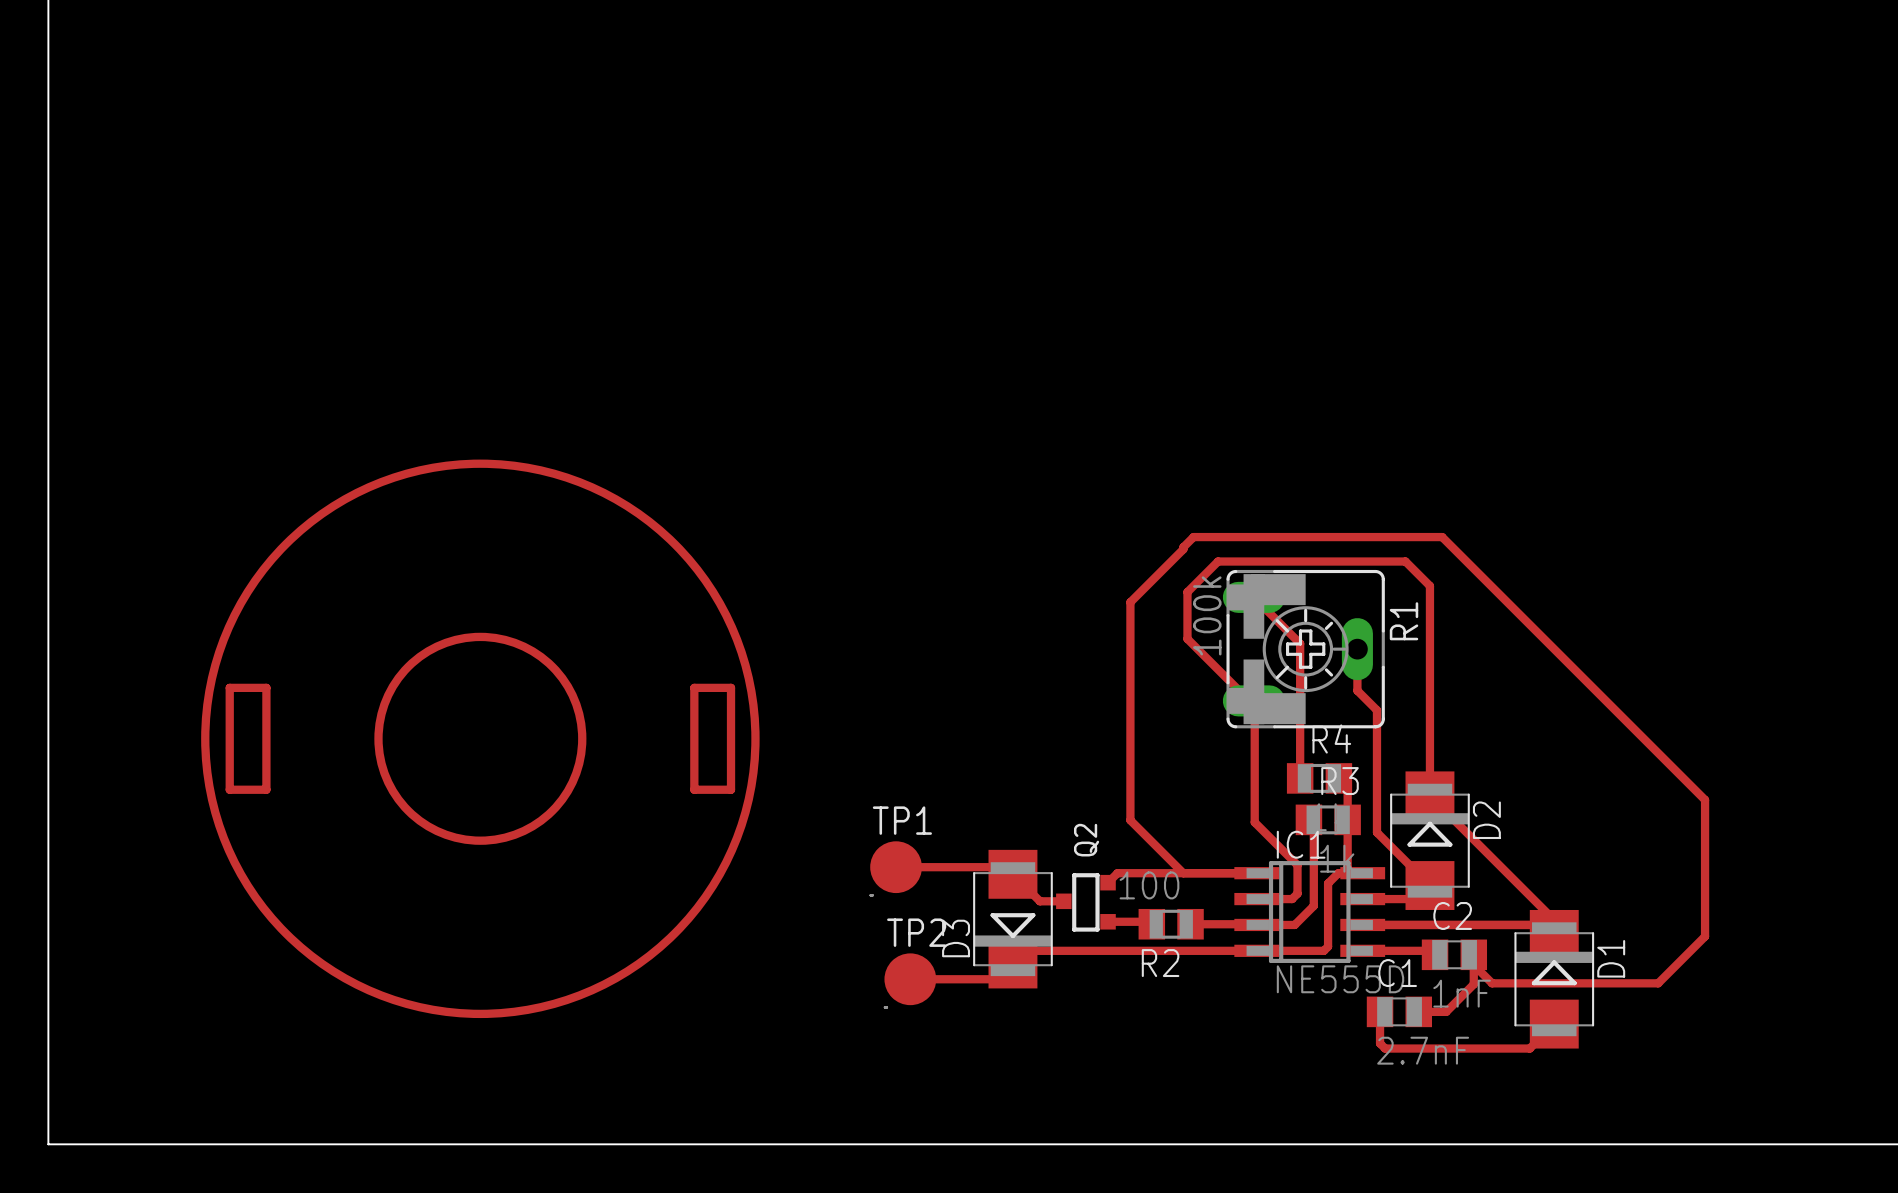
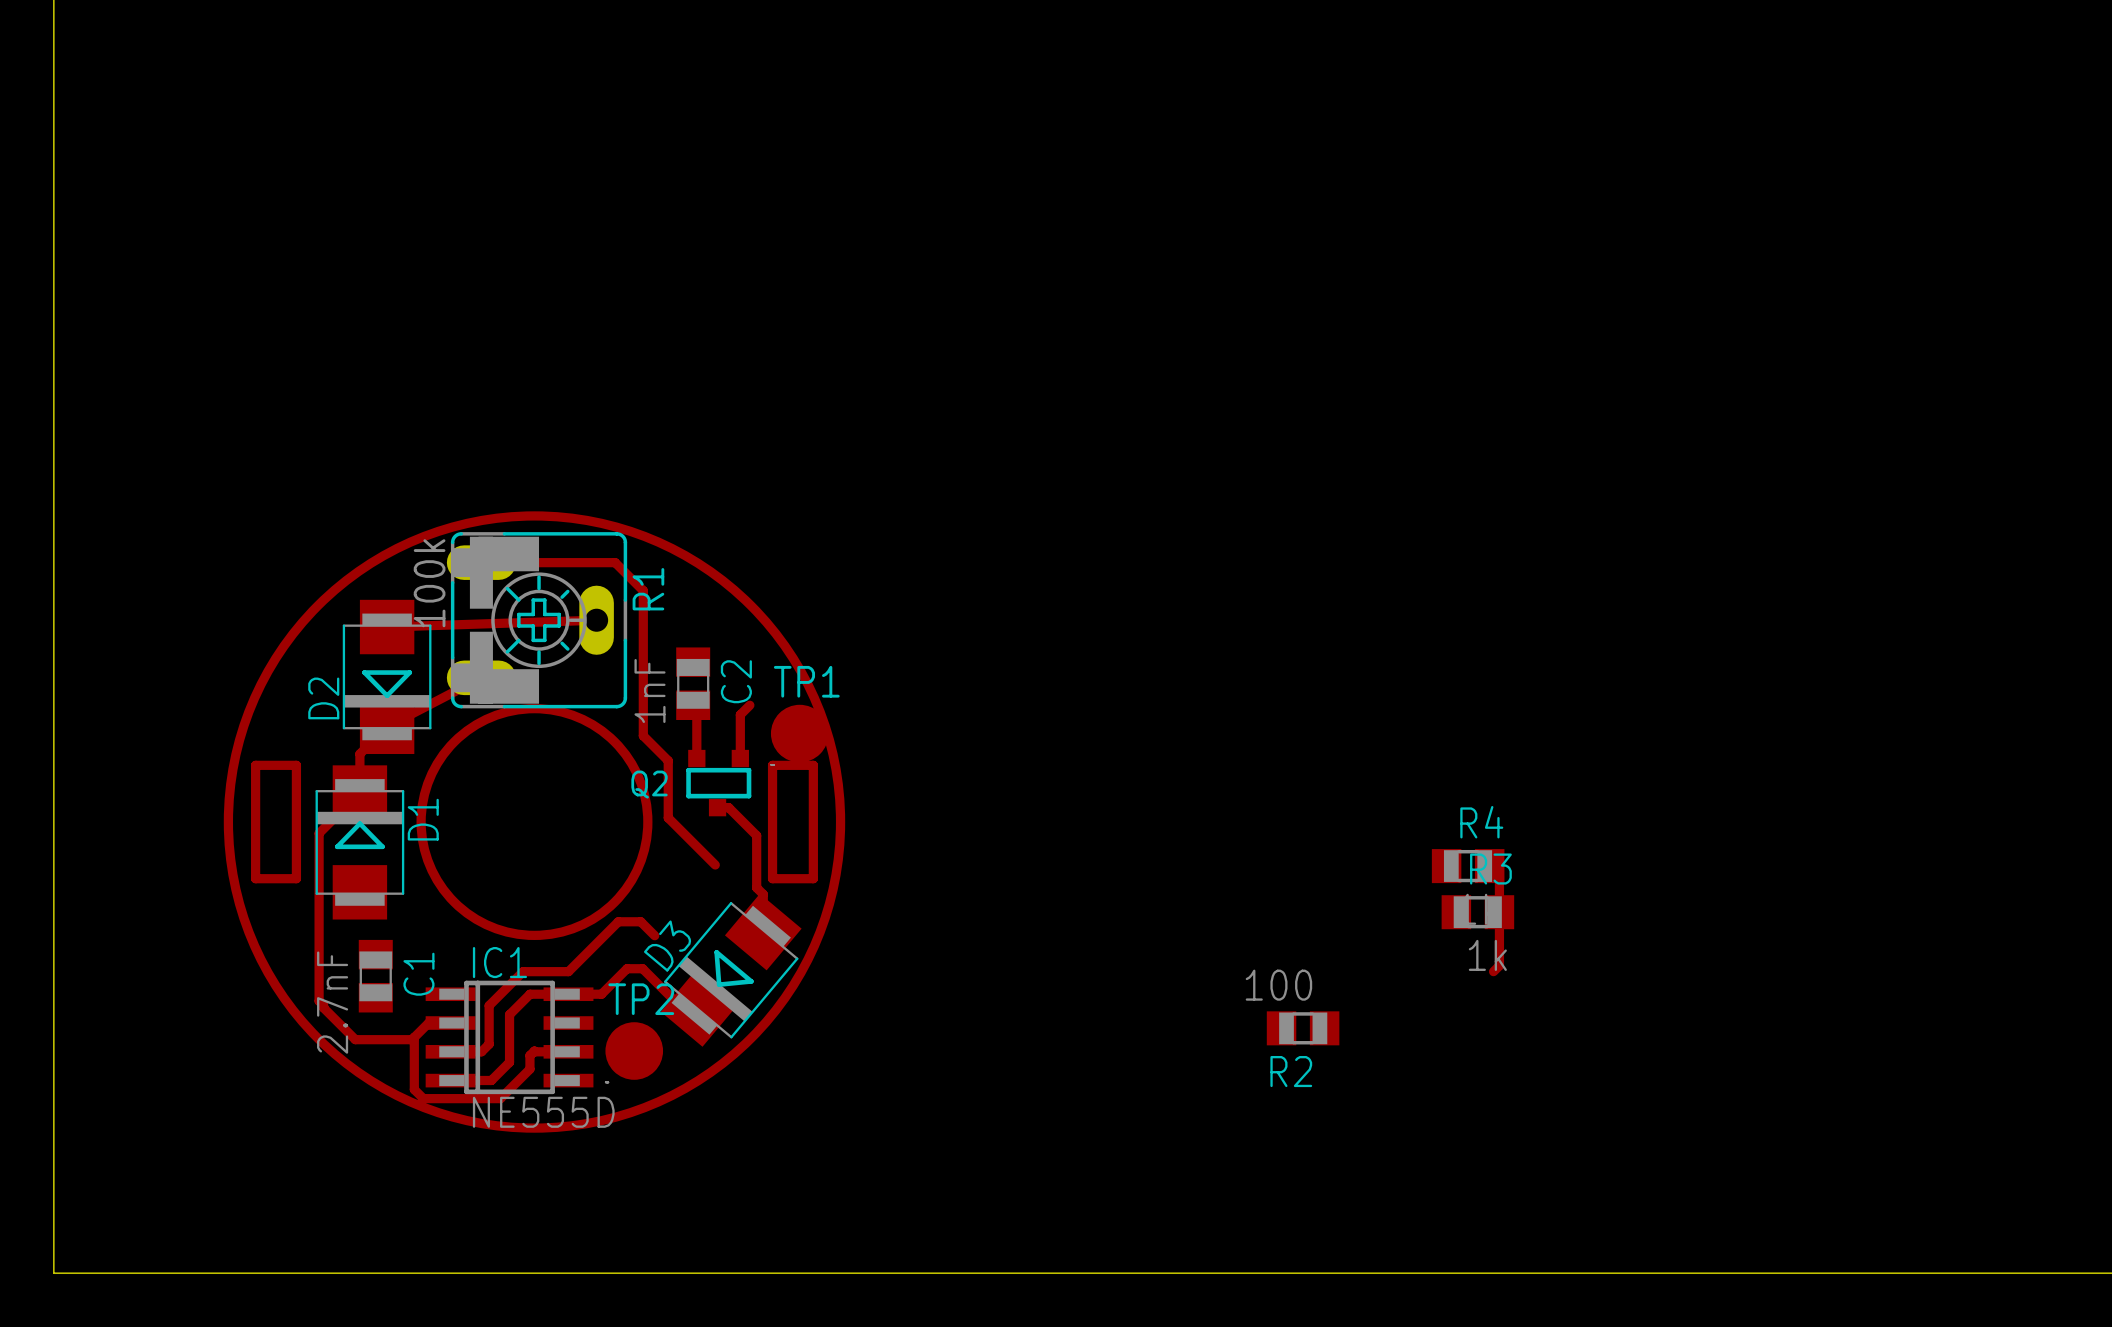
top track: none -> (481, 562) (615, 562) (643, 590) (643, 735) (668, 760) (668, 817) (715, 865)
top track: none -> (596, 620) (387, 627)
top track: (1253, 597) (1300, 643) (1300, 778) -> none
top track: none -> (481, 677) (387, 726) (359, 754) (359, 792) (319, 833) (319, 1001) (323, 1007) (355, 1039) (412, 1039) (428, 1023) (450, 1023)
top track: none -> (693, 705) (696, 708) (696, 758)
top track: none -> (749, 705) (740, 714) (740, 758)
R1 position: (1303, 649) -> (537, 620)
top track: (1357, 649) (1357, 690) (1376, 710) (1376, 832) (1429, 885) (1416, 899) (1362, 899) -> none
top track: (1253, 700) (1258, 705) (1258, 710) (1187, 638) (1187, 592) (1218, 561) (1405, 561) (1429, 585) (1429, 795) (1556, 922) (1556, 926) (1362, 924) -> none
top track: (1254, 701) (1254, 822) (1297, 865) (1297, 893) (1292, 899) (1256, 899) -> none
top track: none -> (717, 807) (728, 807) (756, 835) (756, 887) (763, 894) (763, 932)
top track: (1308, 819) (1313, 824) (1313, 905) (1294, 924) (1190, 924) -> none
D2 rotation: 0° (1429, 840) -> 180° (387, 676)
D2 position: (1429, 840) -> (387, 676)
top track: none -> (654, 935) (640, 921) (618, 921) (568, 971) (523, 971) (489, 1005) (489, 1044) (481, 1051) (450, 1051)
top track: (896, 867) (1005, 867) (1039, 901) (1063, 901) -> none
TP1 position: (896, 867) -> (799, 733)
top track: (1183, 873) (1130, 820) (1130, 602) (1193, 537) (1442, 537) (1705, 799) (1705, 936) (1658, 983) (1492, 983) (1473, 964) -> none
top track: (1256, 873) (1117, 873) (1108, 882) -> none
top track: (1362, 873) (1338, 873) (1328, 883) (1328, 946) (1323, 950) (1026, 950) (997, 979) (910, 979) -> none
Q2 rotation: 0° (1085, 902) -> 90° counterclockwise (718, 783)
Q2 position: (1085, 902) -> (718, 783)
IC1 position: (1309, 912) -> (509, 1037)
top track: none -> (690, 1016) (642, 968) (627, 968) (601, 994) (530, 994) (509, 1014) (509, 1062) (491, 1080) (450, 1080)
D3 rotation: 0° (1012, 919) -> 40° clockwise (731, 970)
D3 position: (1012, 919) -> (731, 970)
top track: (1108, 921) (1149, 921) (1151, 924) -> none
top track: none -> (414, 1037) (414, 1089) (423, 1098) (500, 1098) (529, 1069) (529, 1055) (534, 1051) (568, 1051)
top track: (1362, 950) (1431, 950) (1435, 954) -> none
C2 rotation: 0° (1454, 954) -> 90° clockwise (693, 683)
C2 position: (1454, 954) -> (693, 683)
top track: (1473, 954) (1473, 984) (1446, 1011) (1418, 1011) -> none
TP2 position: (910, 979) -> (634, 1051)
D1 position: (1554, 979) -> (359, 842)
top track: (1380, 1011) (1380, 1043) (1385, 1048) (1529, 1048) (1554, 1024) -> none
C1 rotation: 0° (1399, 1011) -> 90° clockwise (375, 976)
C1 position: (1399, 1011) -> (375, 976)

